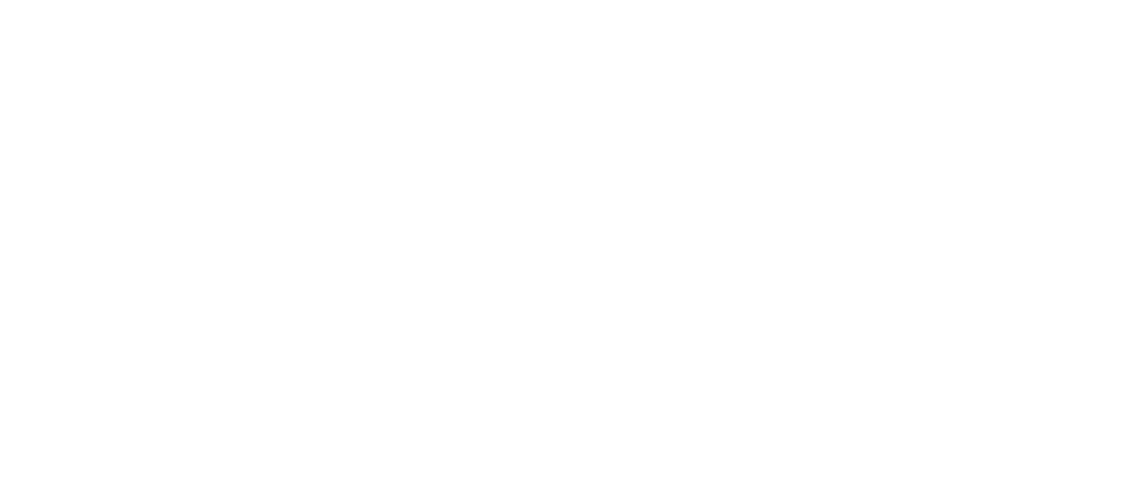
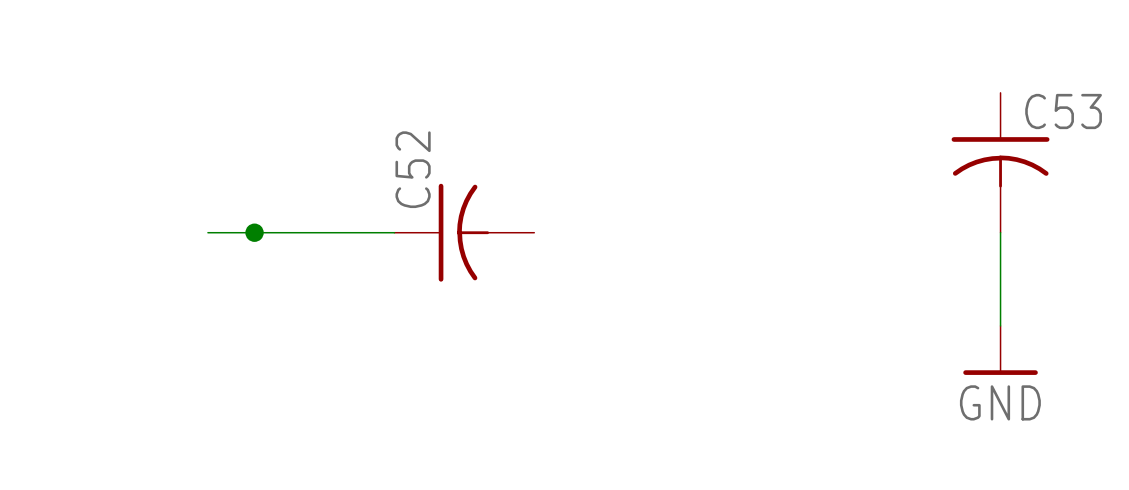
C53: none -> (1000, 162)
wire: none -> (207, 232) (394, 232)
junction: none -> (254, 232)
C52: none -> (464, 232)
wire: none -> (1000, 232) (1000, 325)
power symbol: none -> GND (1000, 350)

